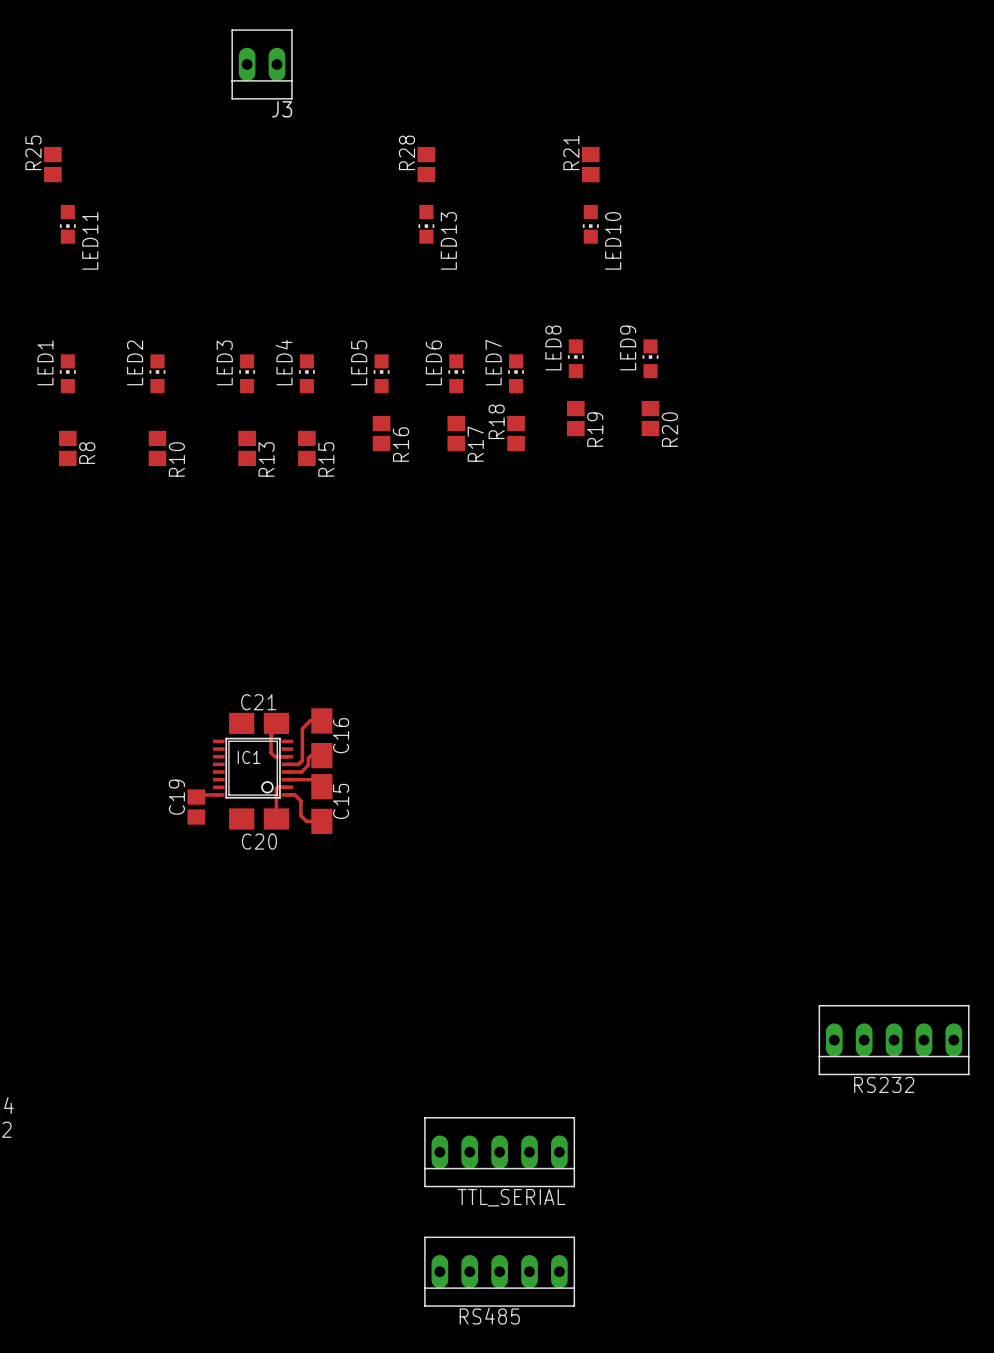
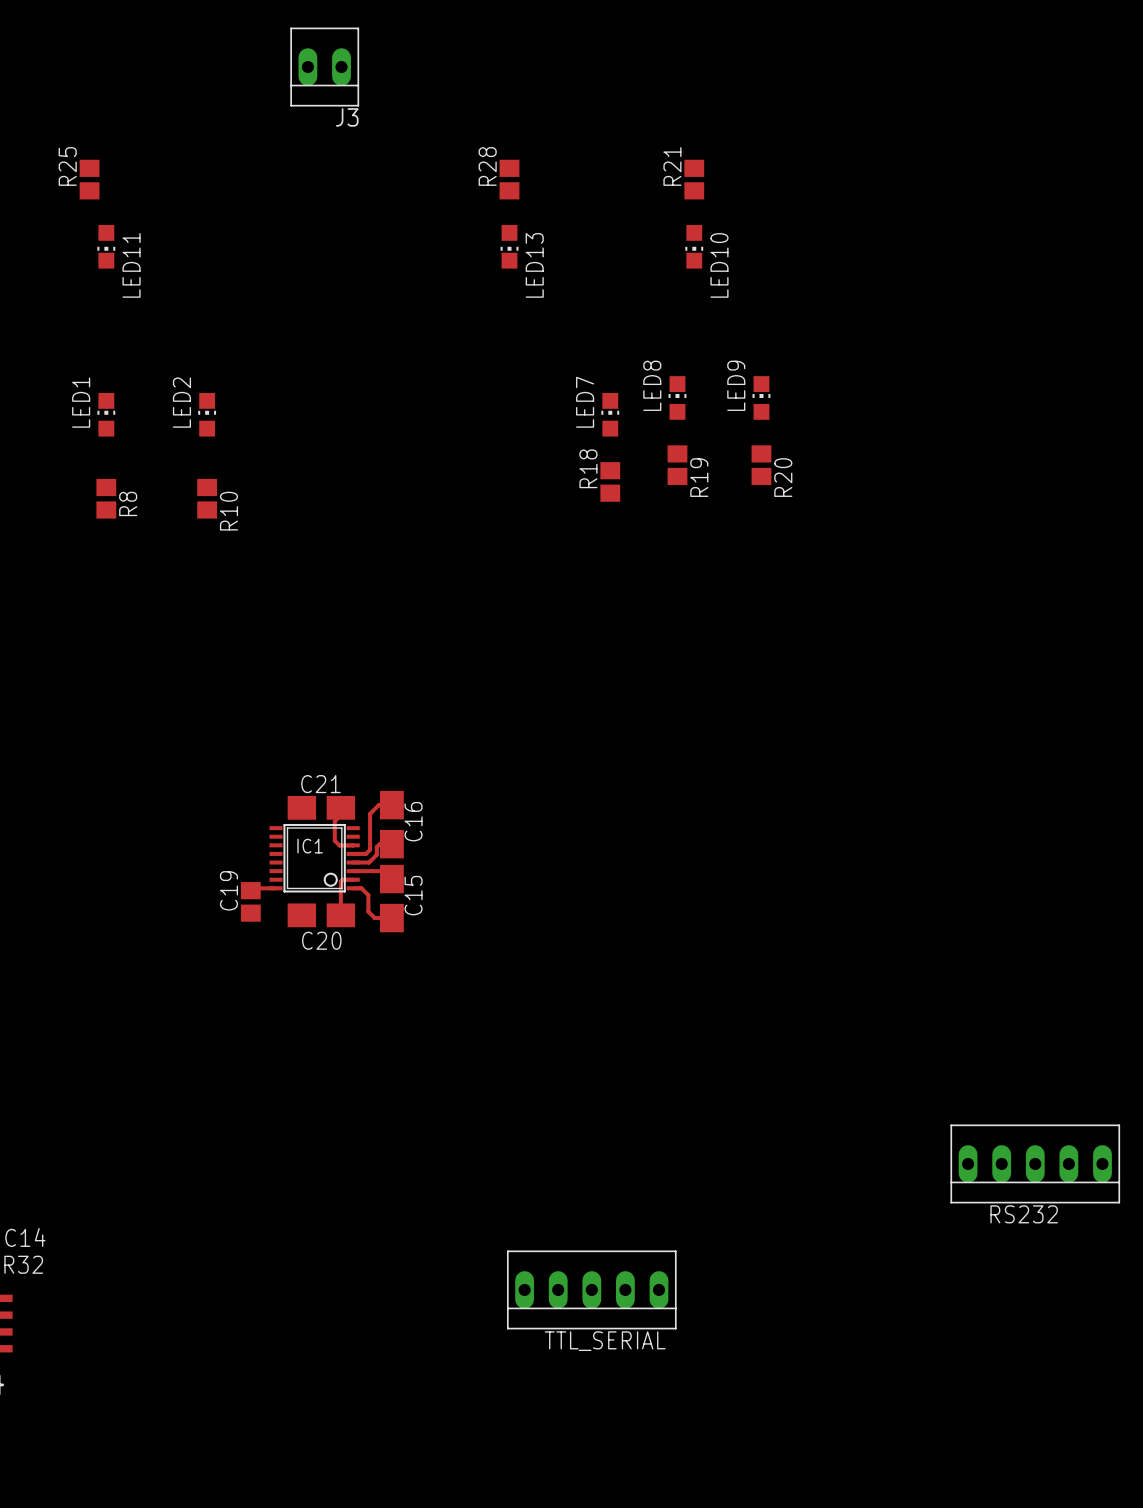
LED3: (247, 373) -> none
LED4: (306, 373) -> none
LED5: (381, 373) -> none
LED6: (456, 373) -> none
R16: (381, 433) -> none
R17: (456, 433) -> none
R13: (247, 448) -> none
R15: (306, 448) -> none
part: RS485 (499, 1271) -> none

